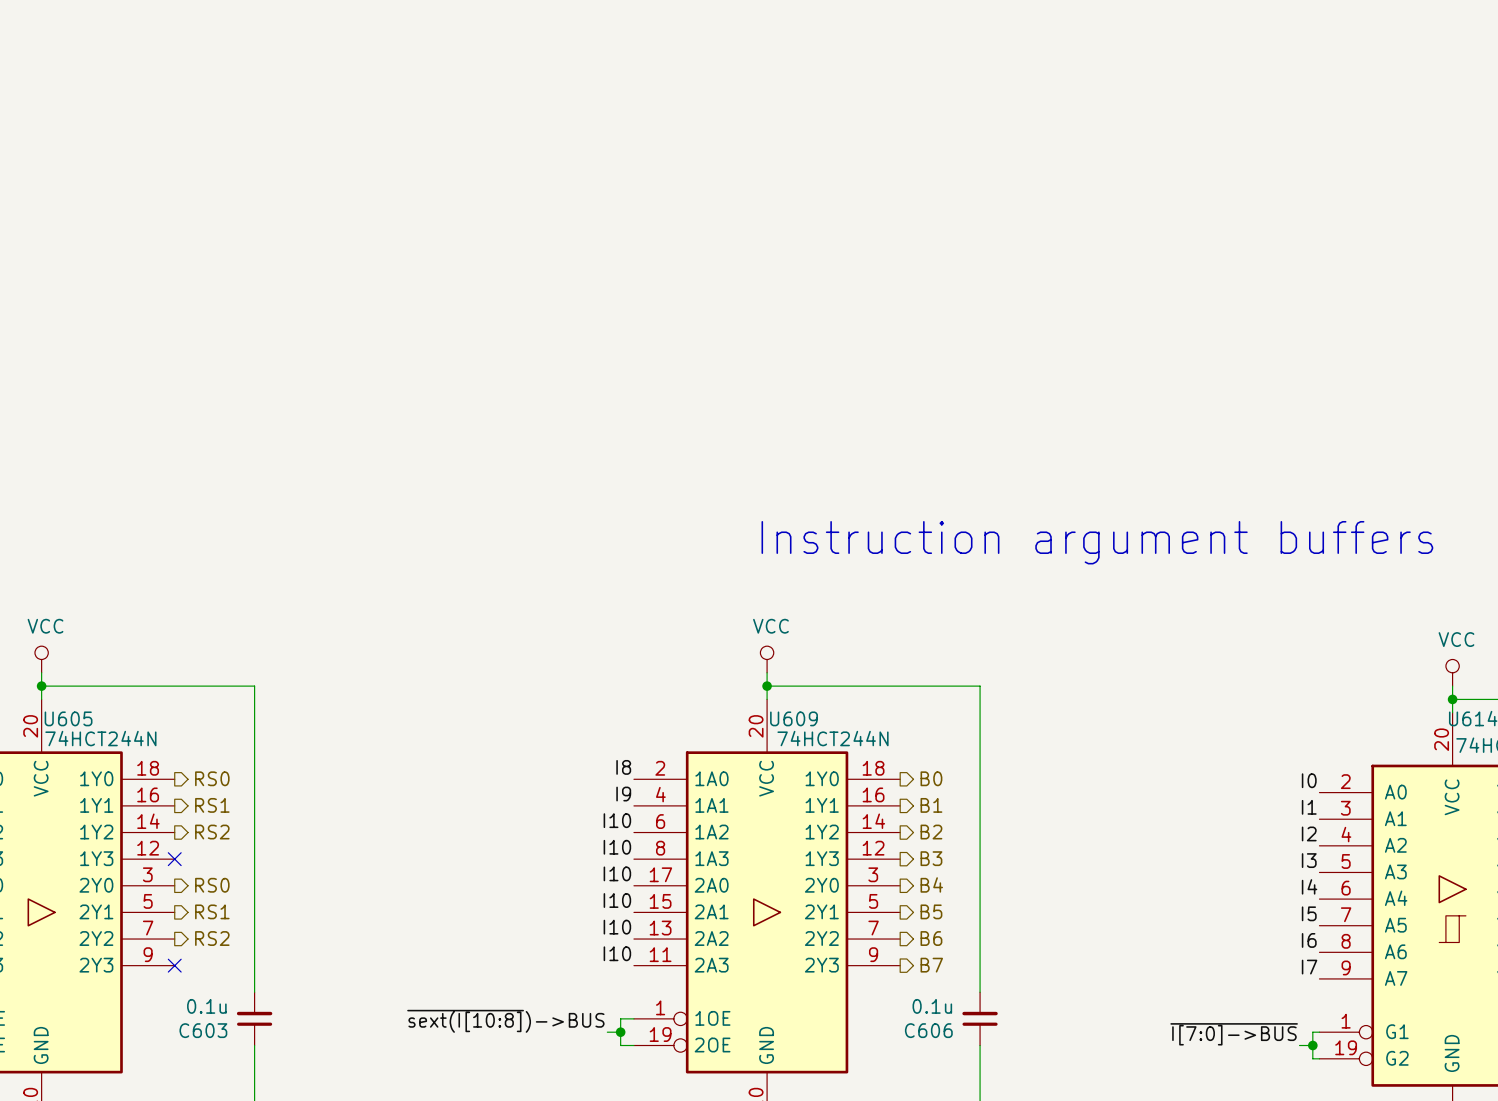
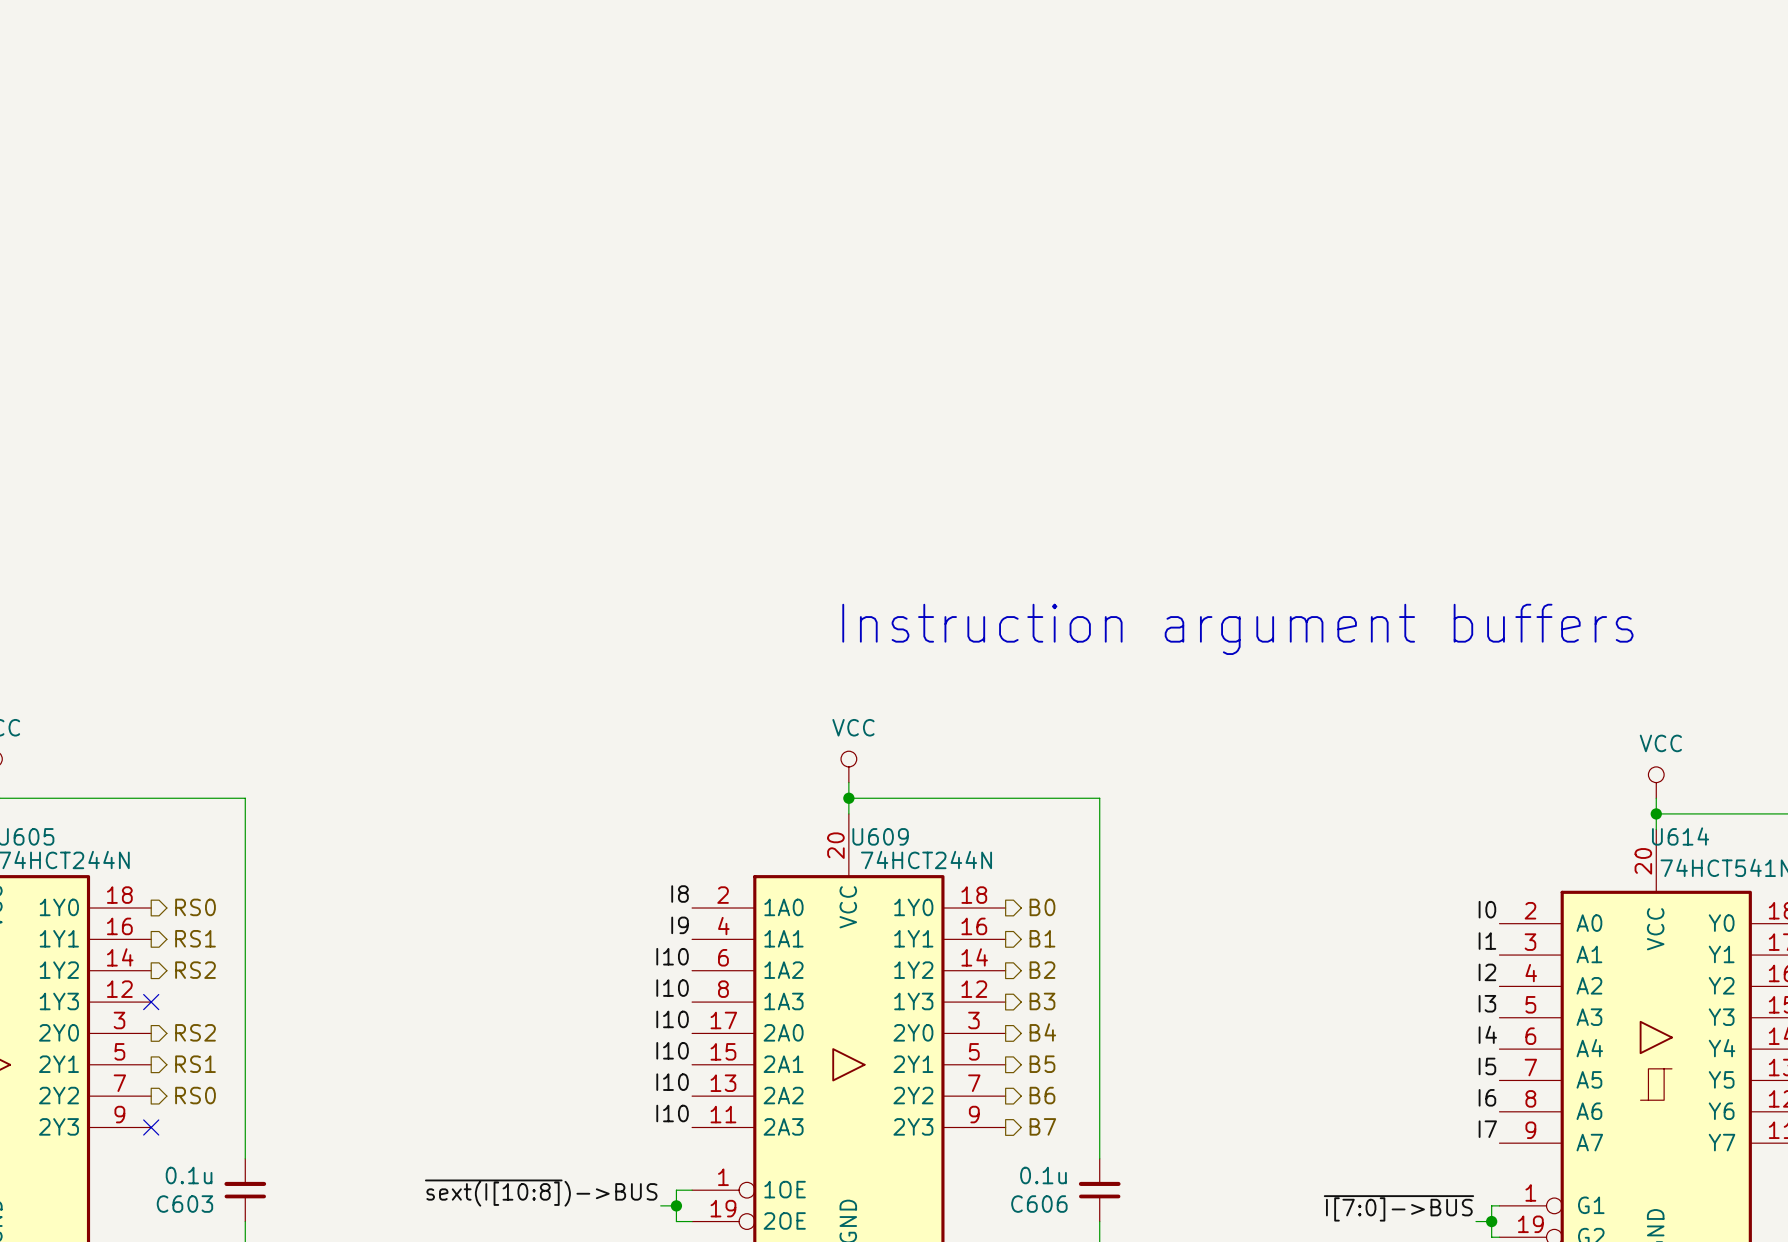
hierarchical label: RS0 (212, 885) -> RS2 (195, 1032)
hierarchical label: RS2 (212, 938) -> RS0 (195, 1095)

